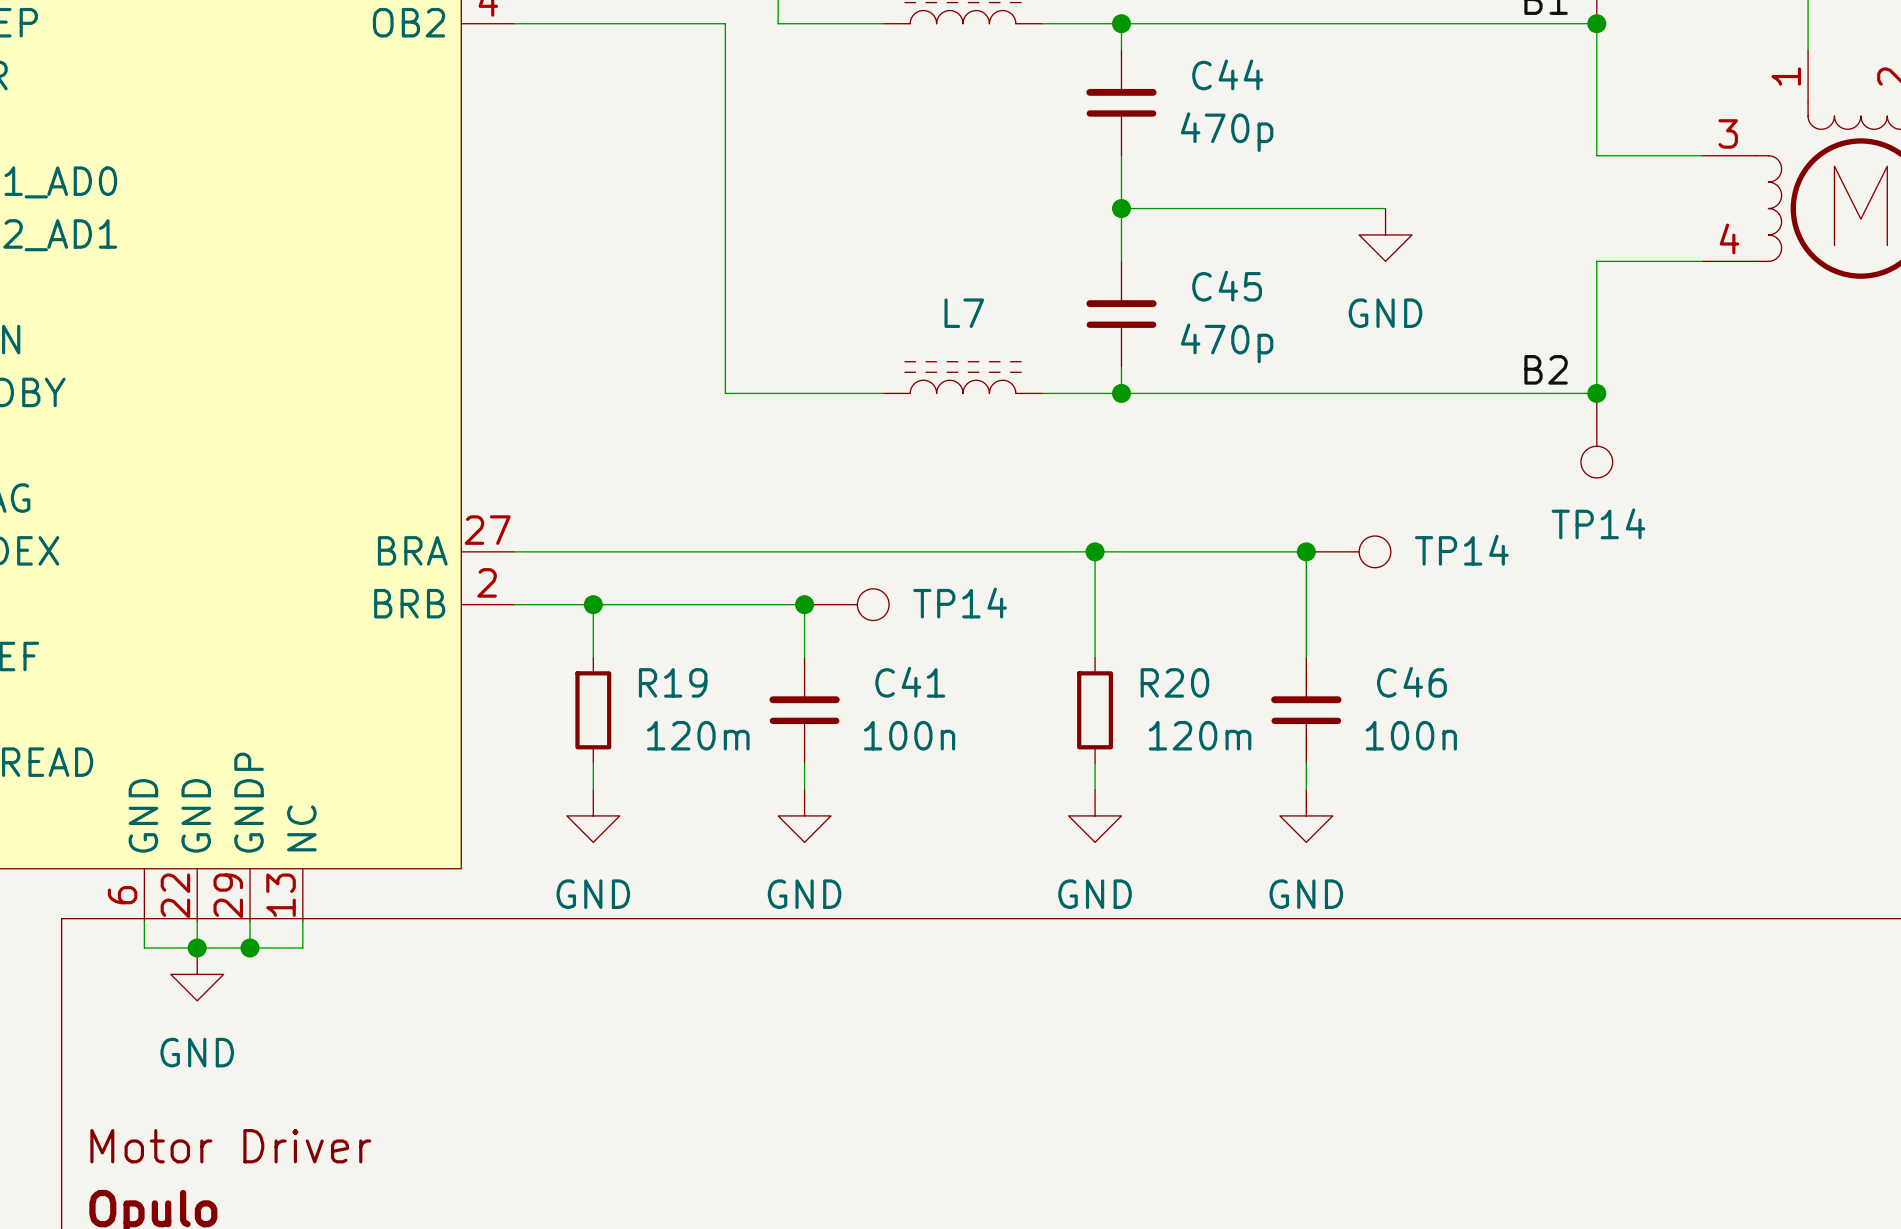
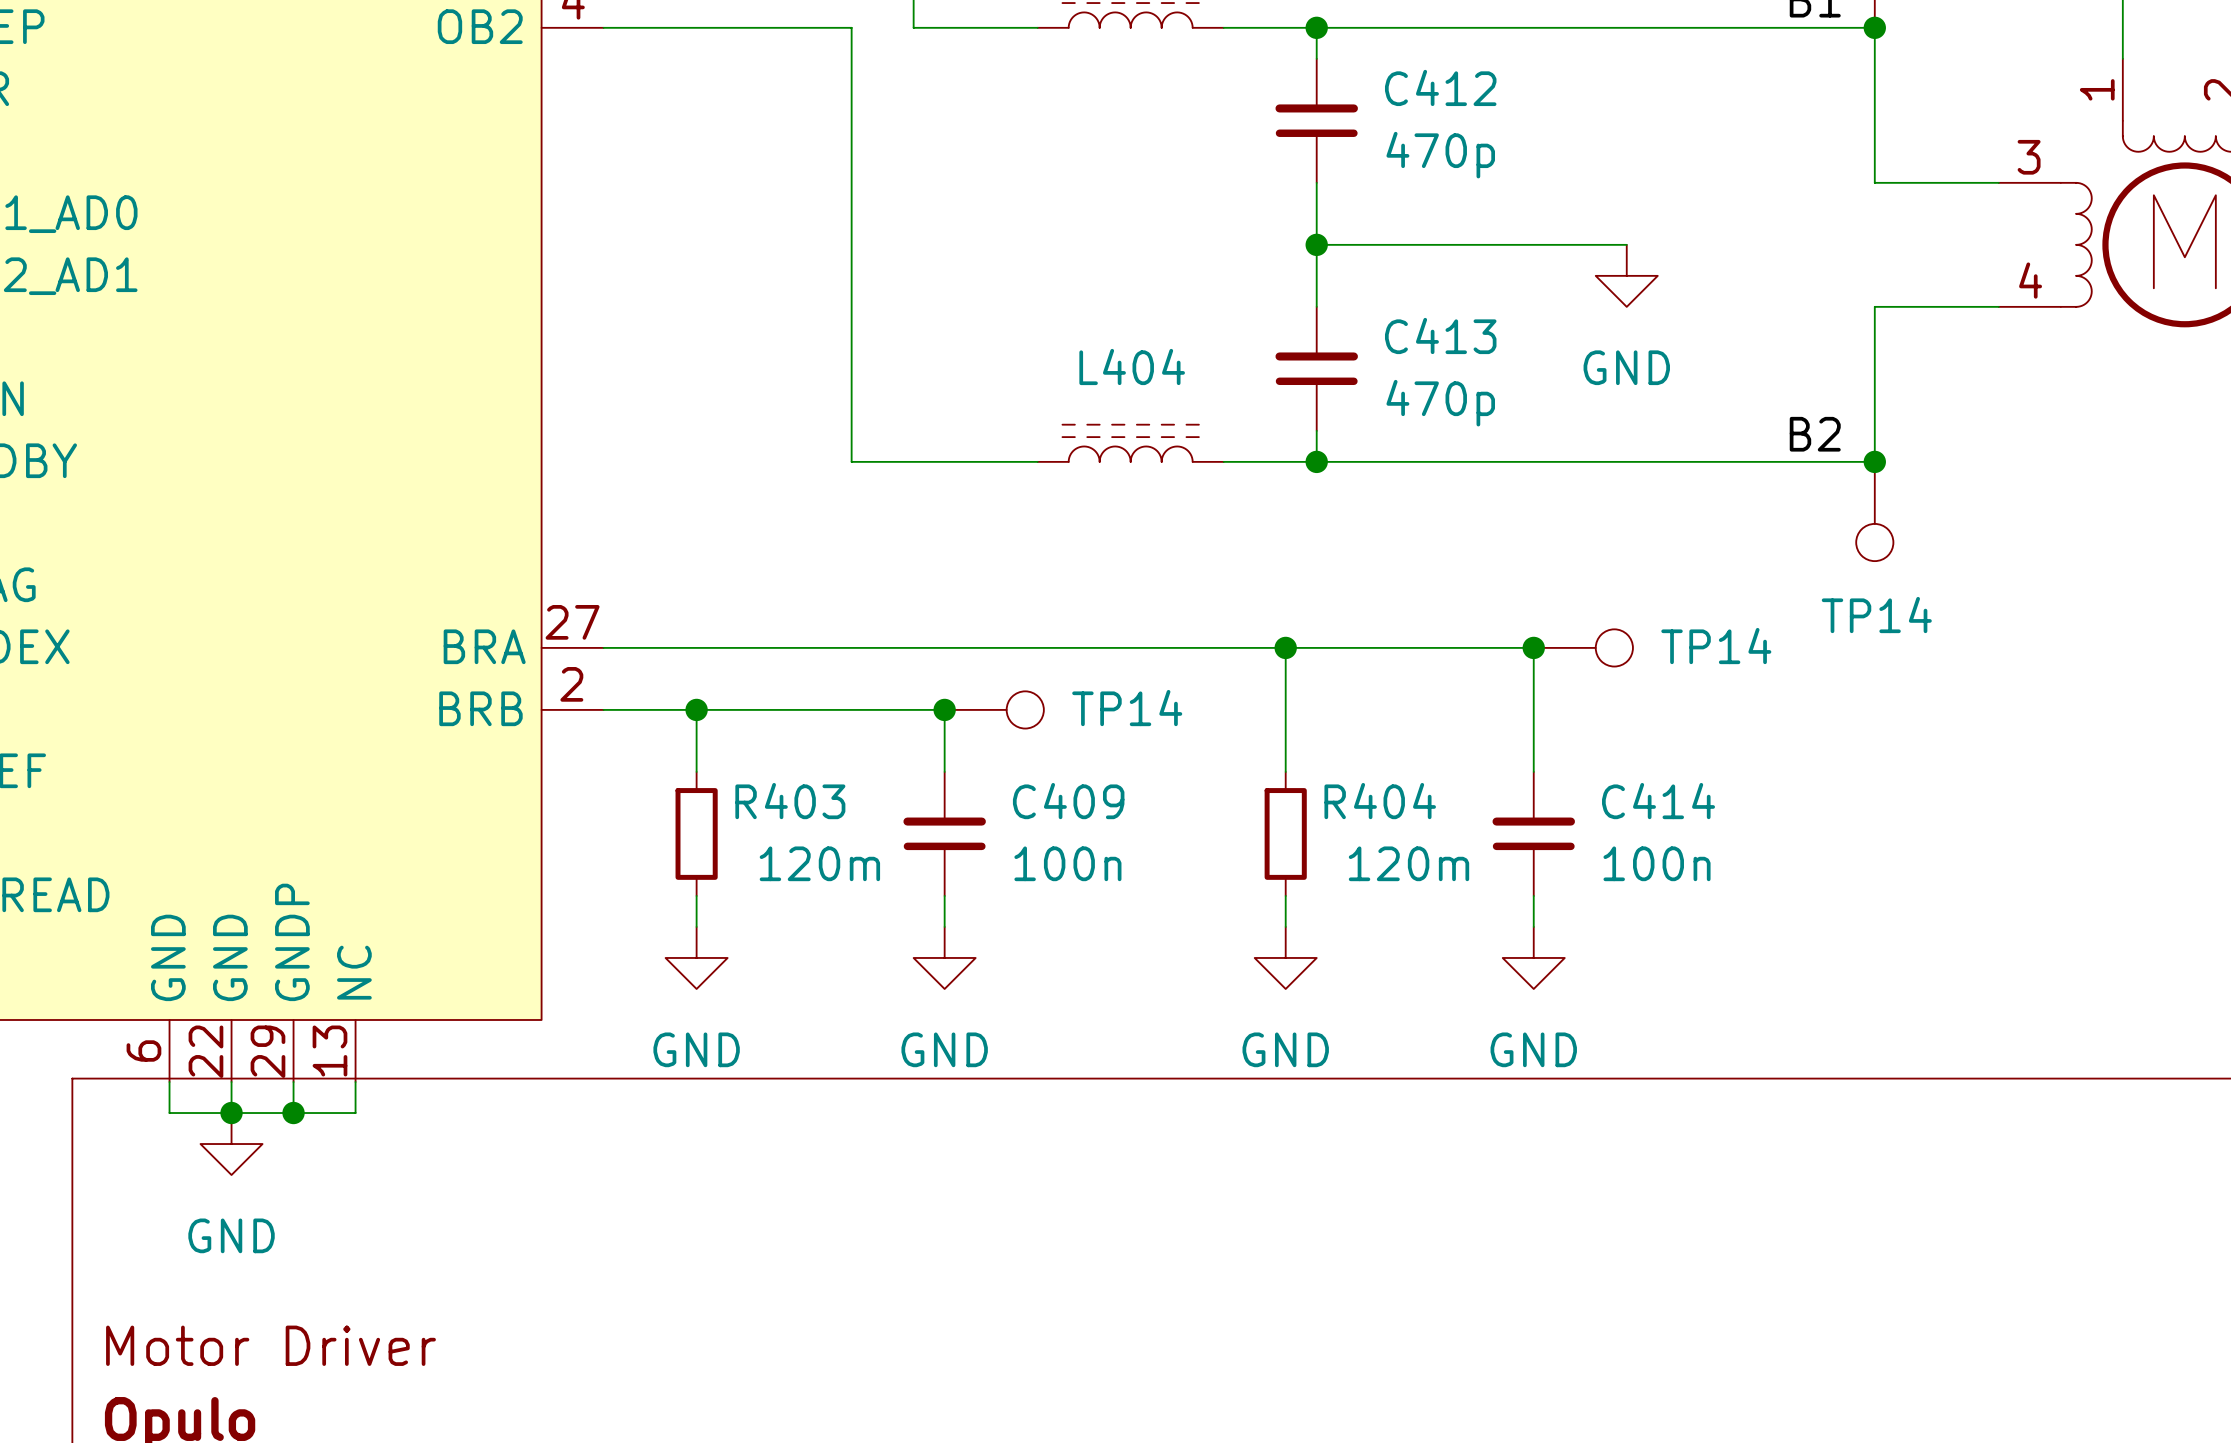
C44 name: C44 (1227, 74) -> C412 (1440, 87)
C45 name: C45 (1227, 286) -> C413 (1440, 335)
L7 name: L7 (964, 313) -> L404 (1132, 366)
R19 name: R19 (673, 682) -> R403 (790, 801)
C41 name: C41 (910, 682) -> C409 (1068, 801)
R20 name: R20 (1174, 682) -> R404 (1380, 801)
C46 name: C46 (1411, 682) -> C414 (1658, 801)

